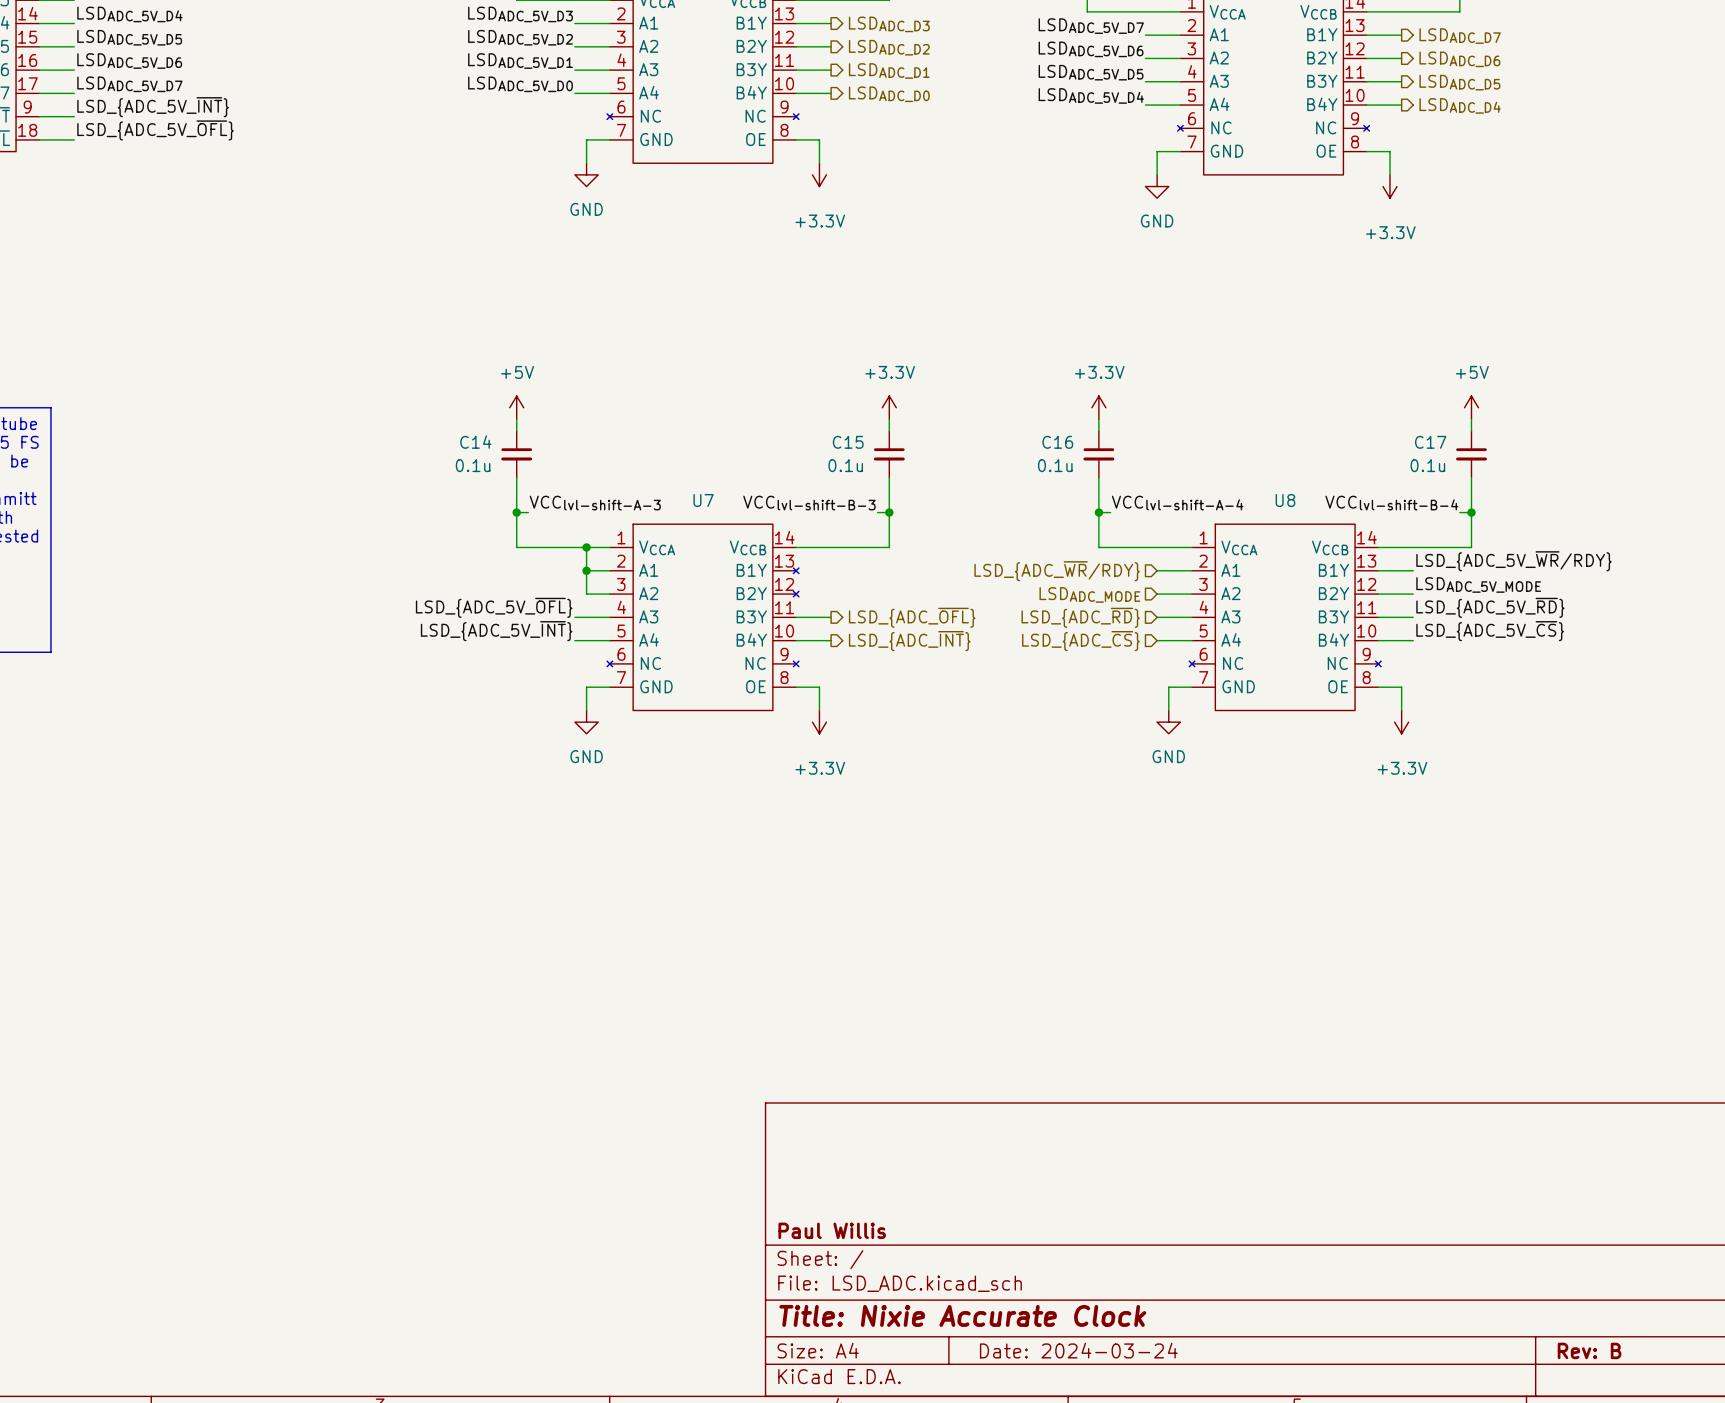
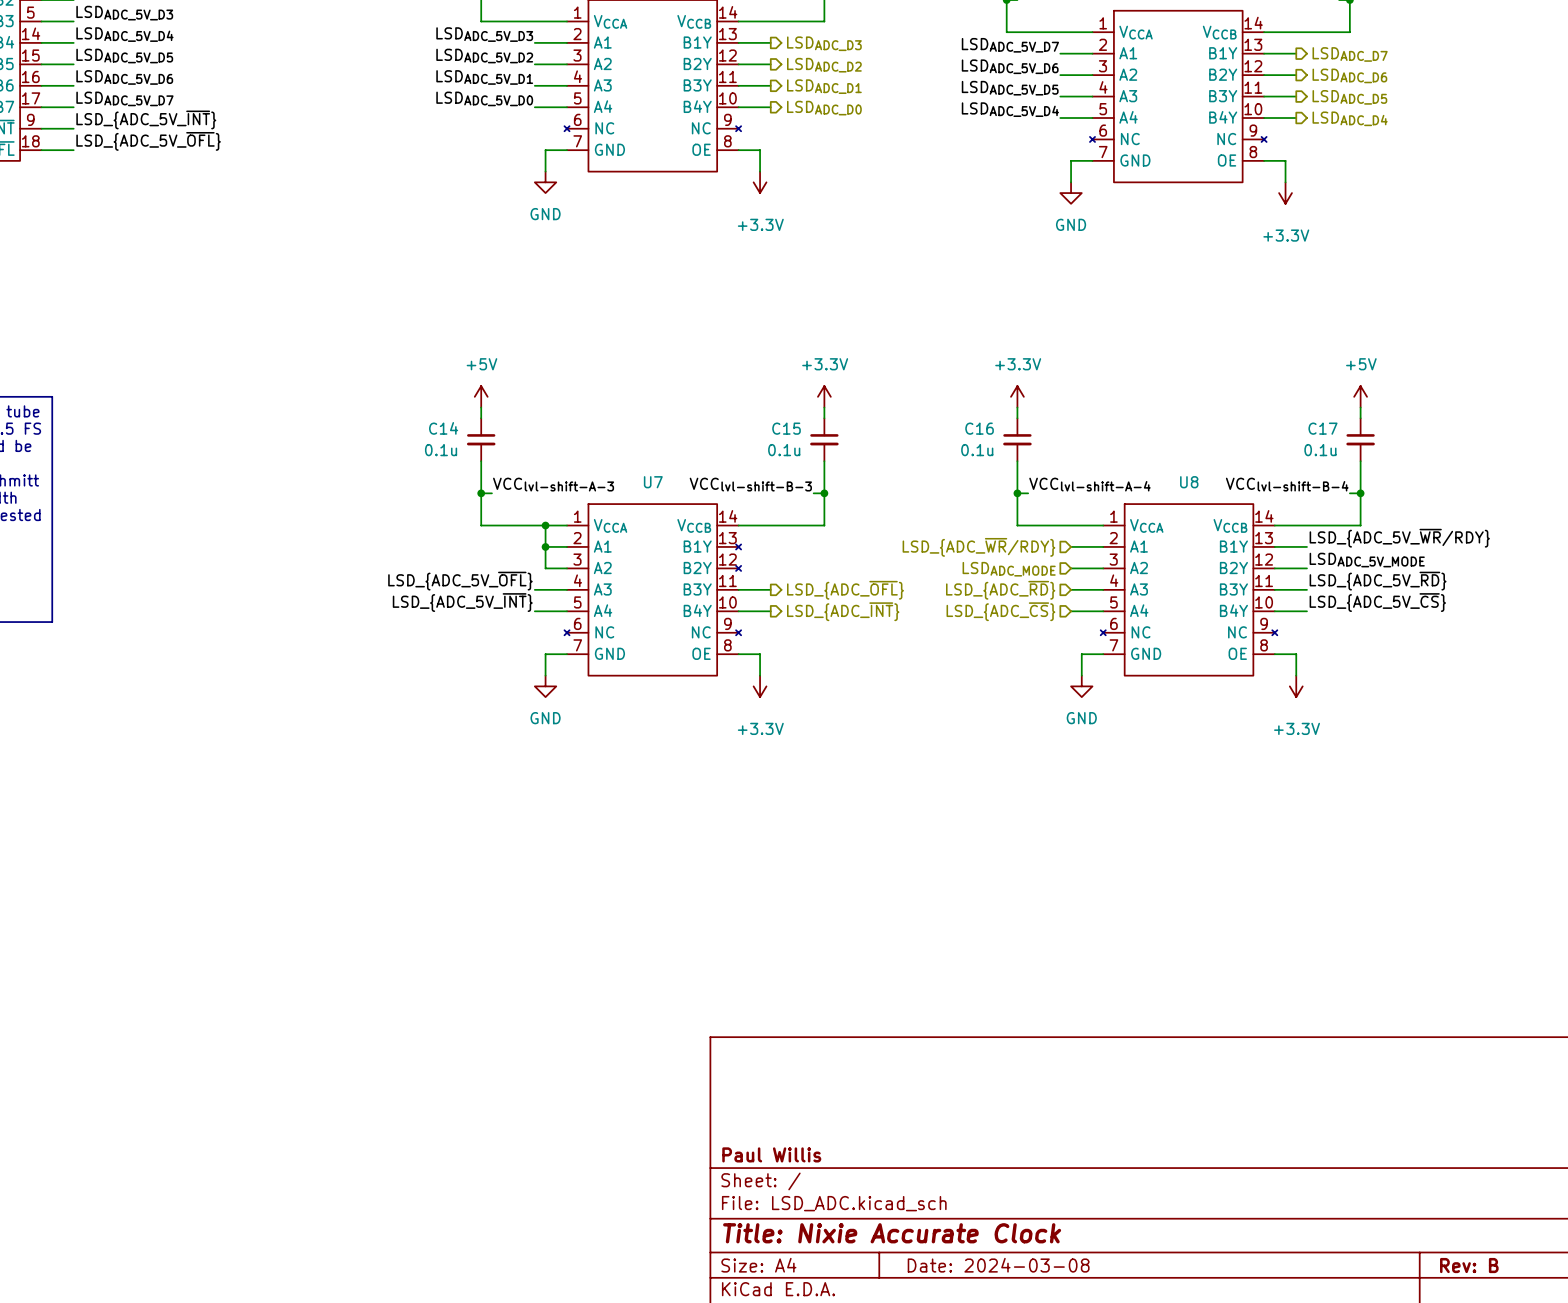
title block: Date: 2024-03-24 (1078, 1350) -> Date: 2024-03-08 (998, 1265)

